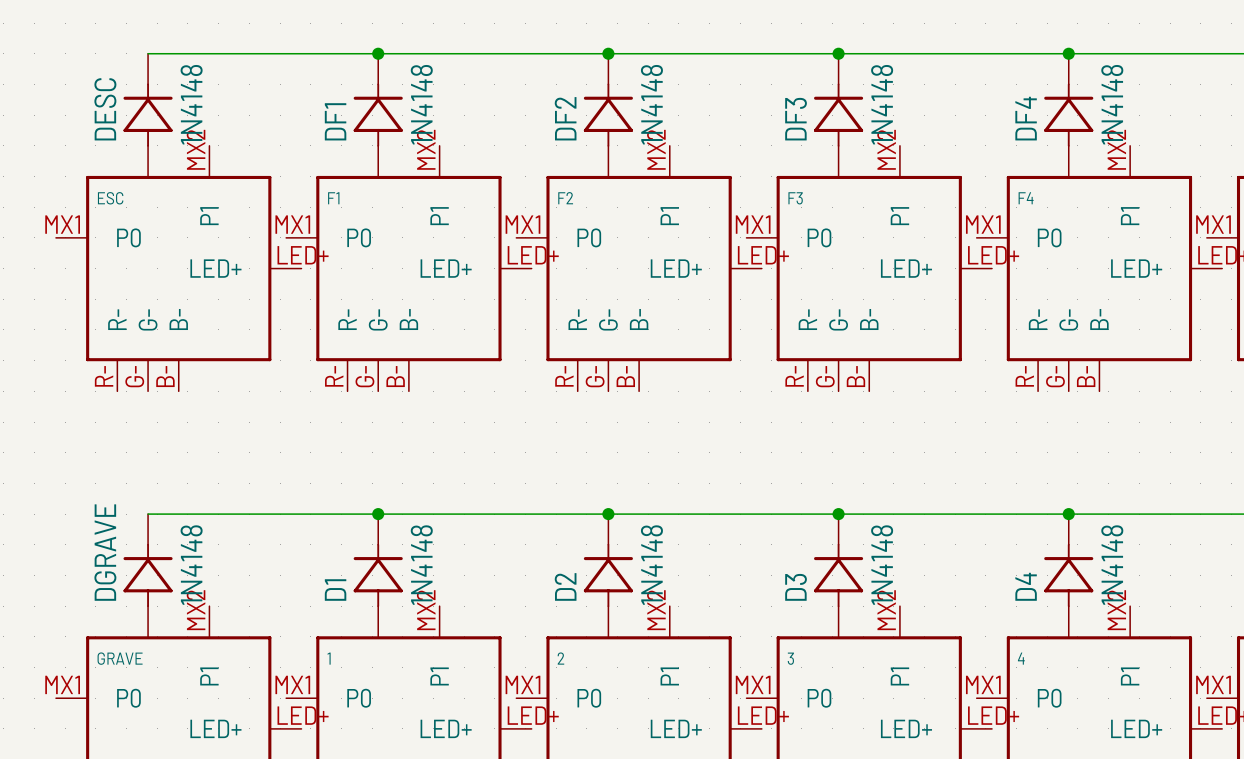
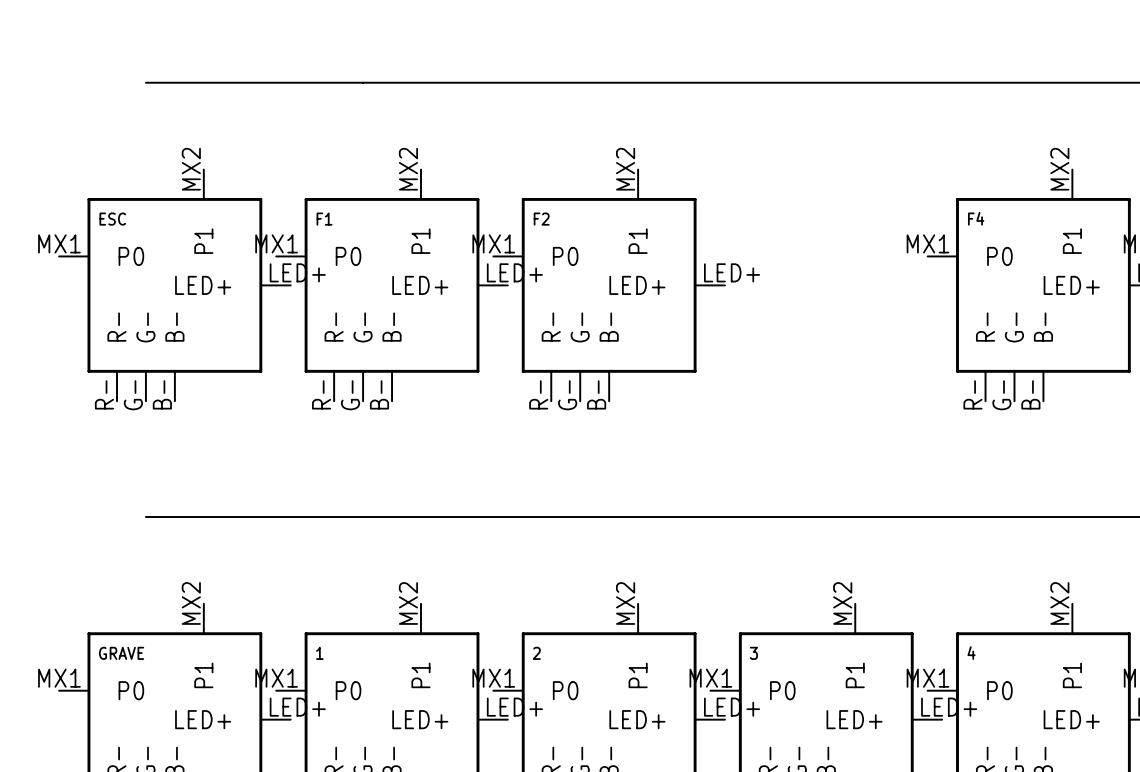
junction: (378, 53) -> none
junction: (608, 53) -> none
junction: (838, 53) -> none
junction: (1068, 53) -> none
DESC: 1N4148 (148, 115) -> none
DF1: 1N4148 (378, 115) -> none
DF2: 1N4148 (608, 115) -> none
DF3: 1N4148 (838, 115) -> none
DF4: 1N4148 (1068, 115) -> none
F3: (869, 268) -> none
junction: (378, 514) -> none
junction: (608, 514) -> none
junction: (838, 514) -> none
junction: (1068, 514) -> none
DGRAVE: 1N4148 (148, 575) -> none
D1: 1N4148 (378, 575) -> none
D2: 1N4148 (608, 575) -> none
D3: 1N4148 (838, 575) -> none
D4: 1N4148 (1068, 575) -> none

